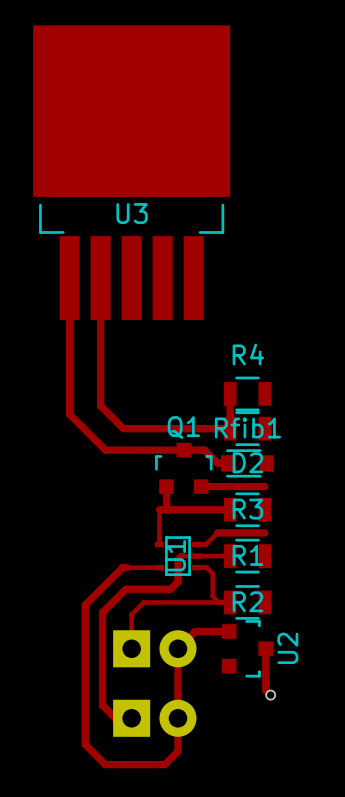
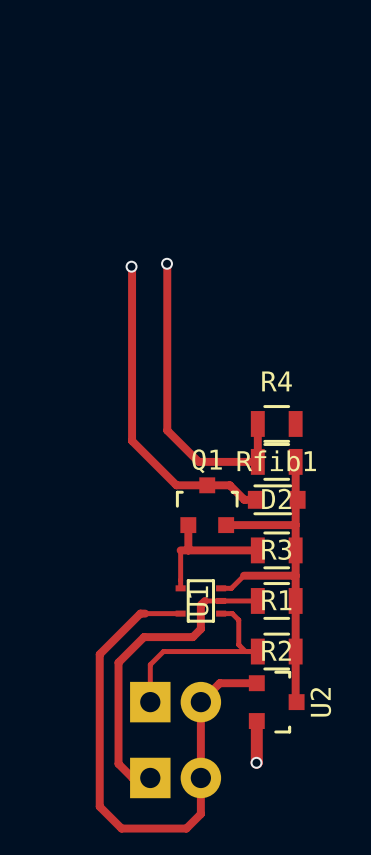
U3: (131, 172) -> none
via: none -> (167, 263)
via: none -> (131, 266)
track: (69, 278) (69, 414) (105, 450) (155, 450) -> (131, 266) (132, 440) (176, 485)
track: (100, 278) (100, 405) (123, 428) (175, 428) -> (167, 264) (167, 430) (198, 461)
track: (265, 648) (265, 690) (270, 695) -> (296, 702) (295, 501) (297, 499) (295, 497) (295, 461)
track: none -> (256, 721) (256, 762)
via position: (270, 695) -> (256, 762)

